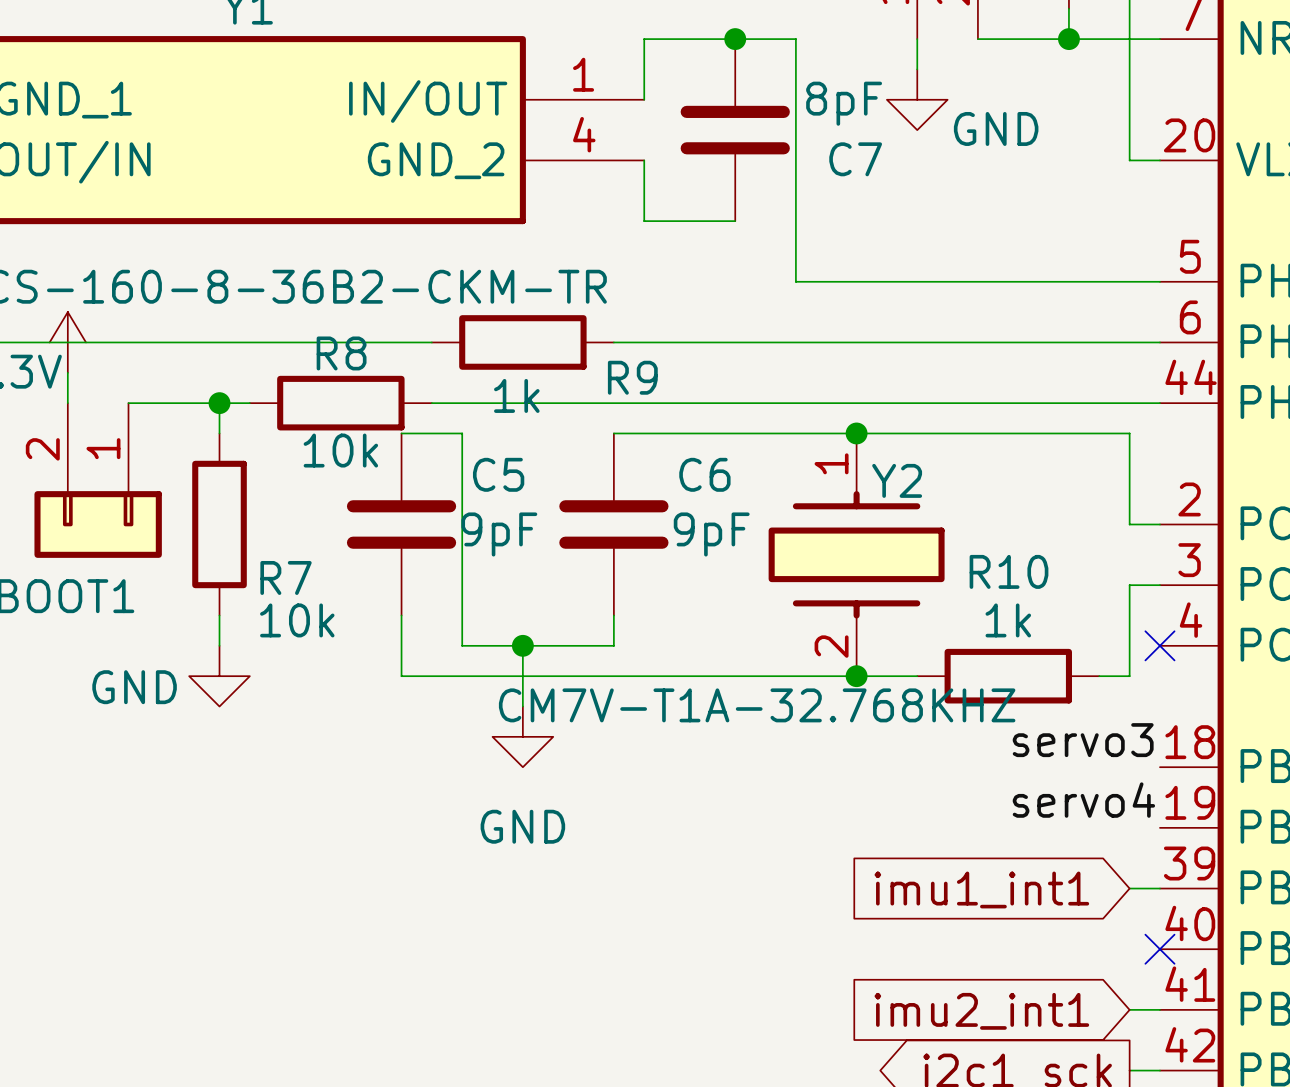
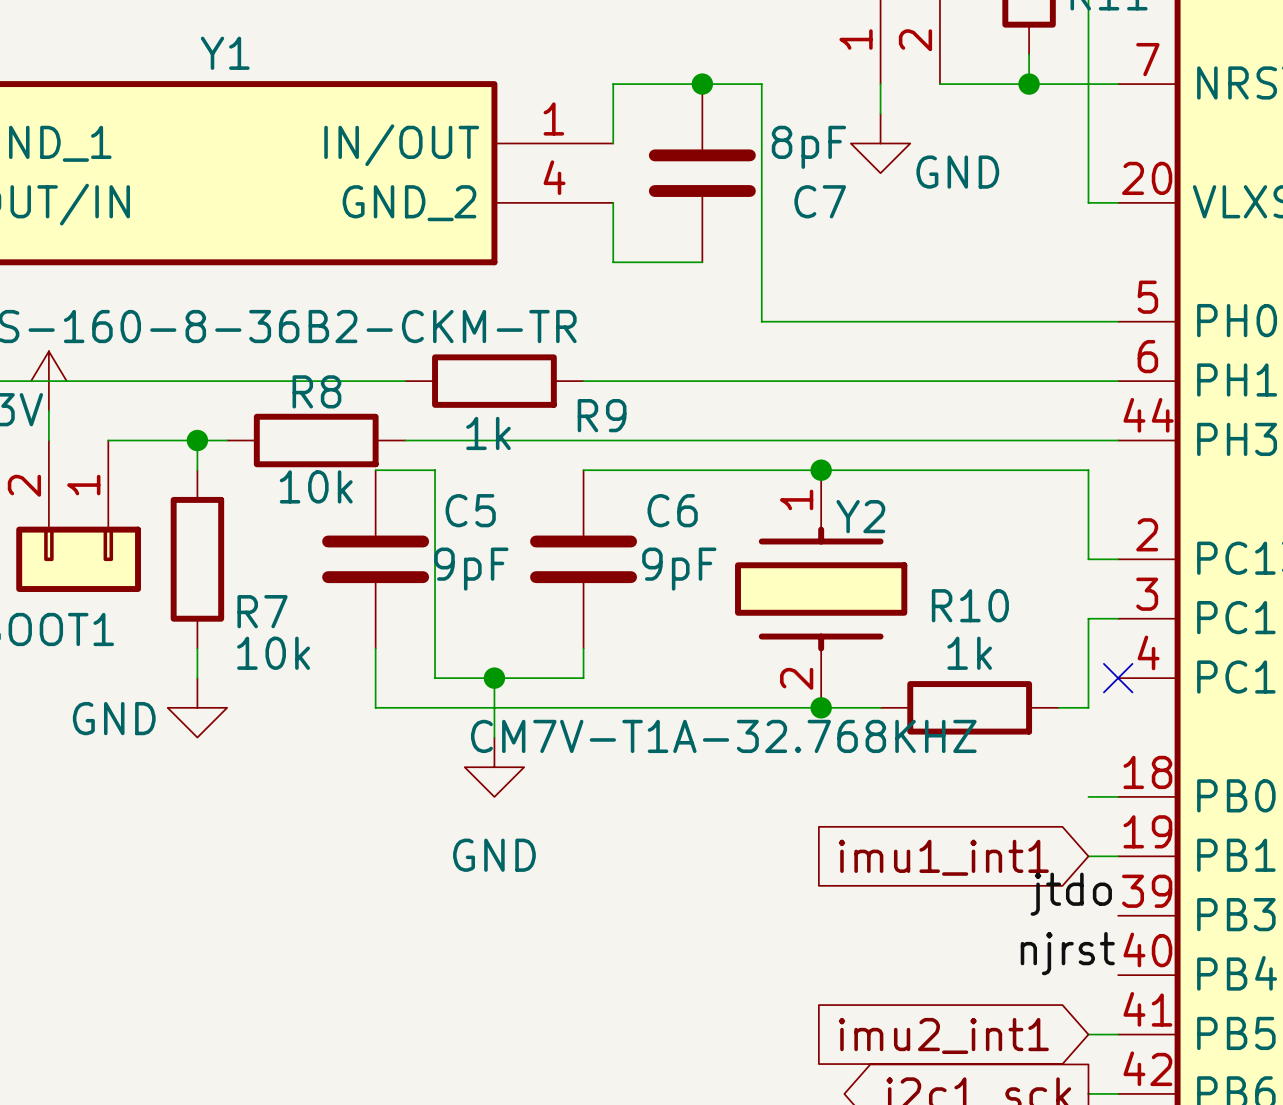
label: servo3 (1083, 740) -> none
wire: none -> (1088, 796) (1118, 796)
label: servo4 (1083, 800) -> none
label: none -> jtdo (1071, 894)
wire: (1129, 888) (1159, 888) -> (1088, 856) (1118, 856)
global label position: imu1_int1 (981, 889) -> imu1_int1 (943, 857)
label: none -> njrst (1067, 953)
no-connect mark: (1159, 949) -> none

